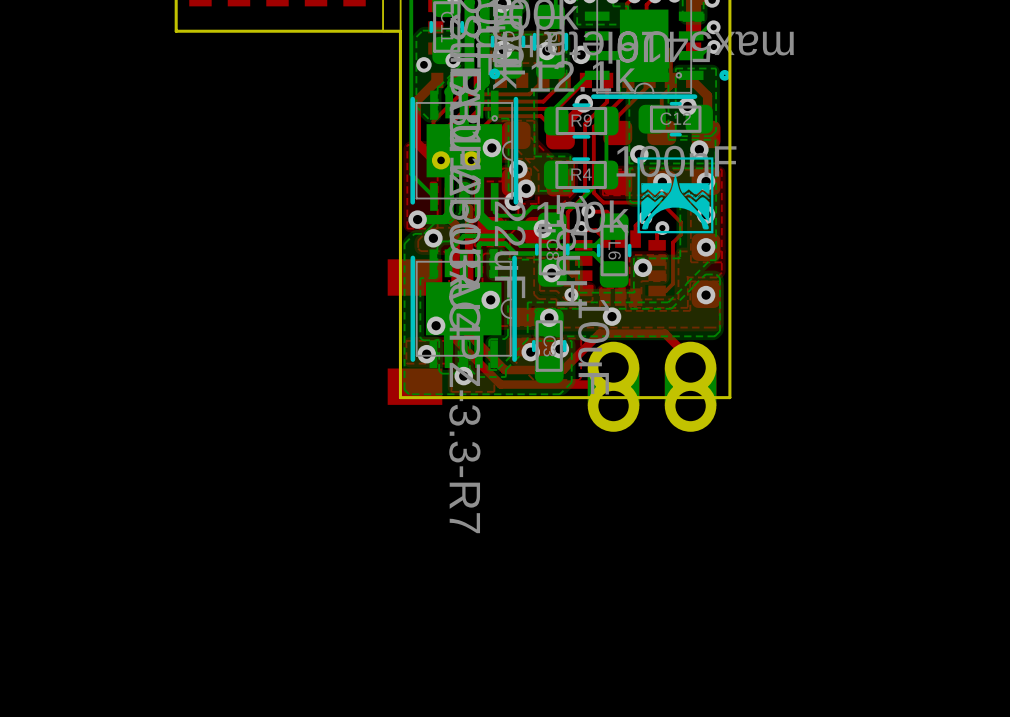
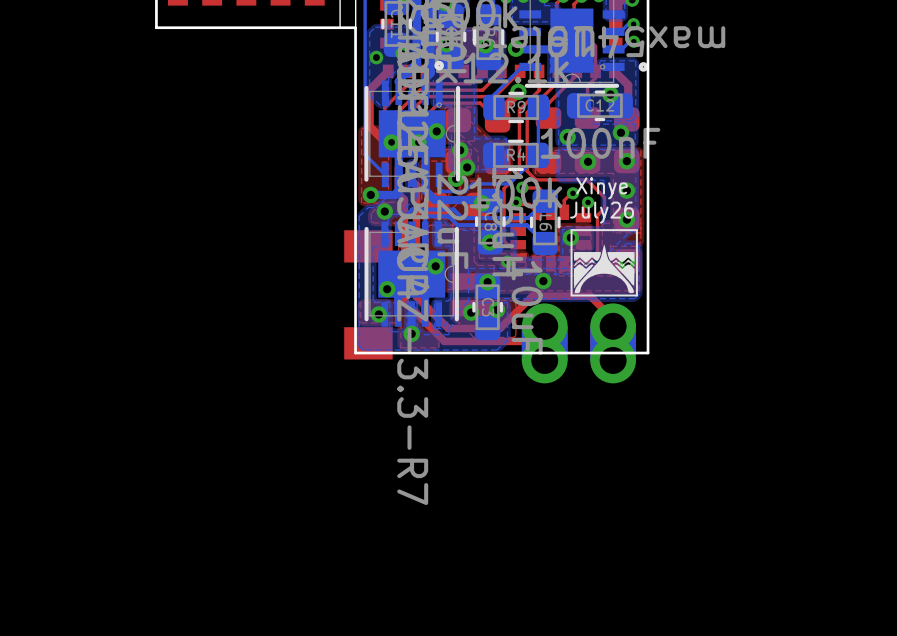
drawing position: (675, 195) -> (604, 262)
text: none -> Xinye (602, 188)
text: none -> July26 (602, 212)

